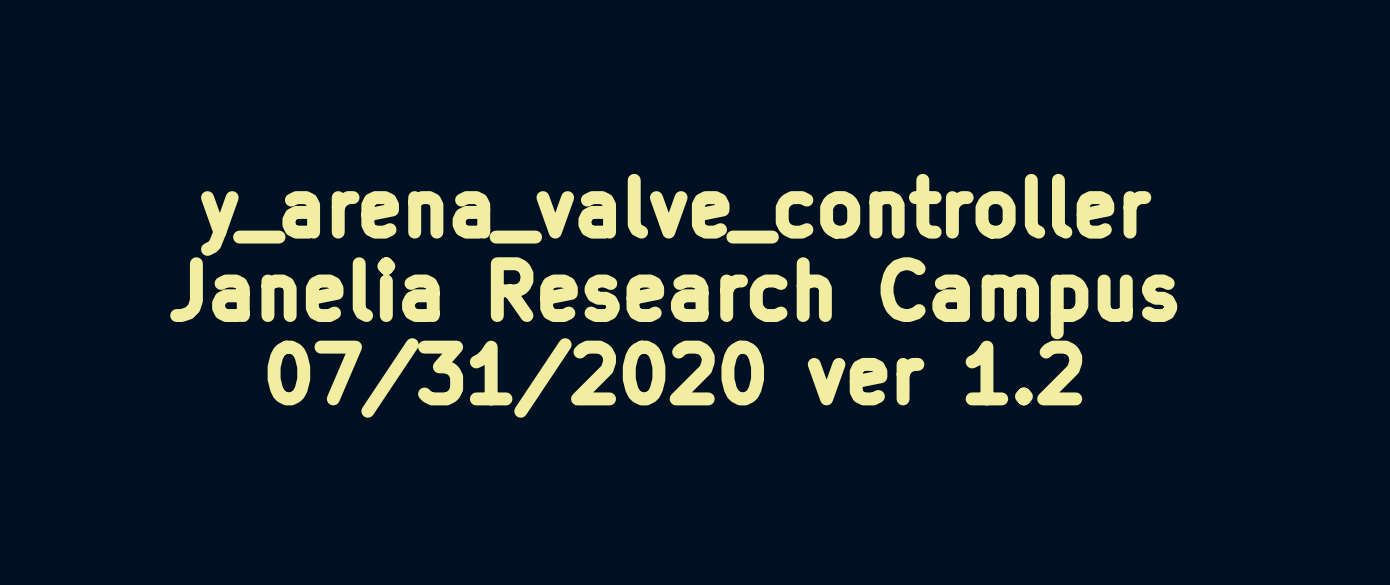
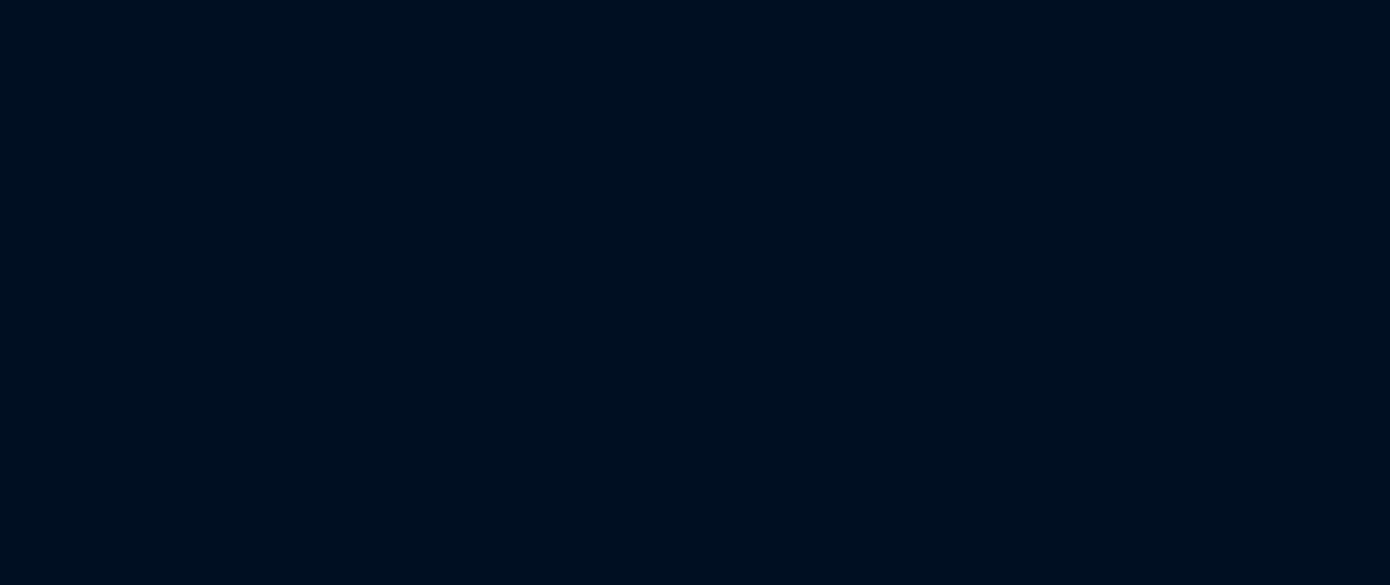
text: y_arena_valve_controller (676, 214) -> none
text: Janelia Research Campus (673, 298) -> none
text: 07/31/2020 ver 1.2 (674, 377) -> none

